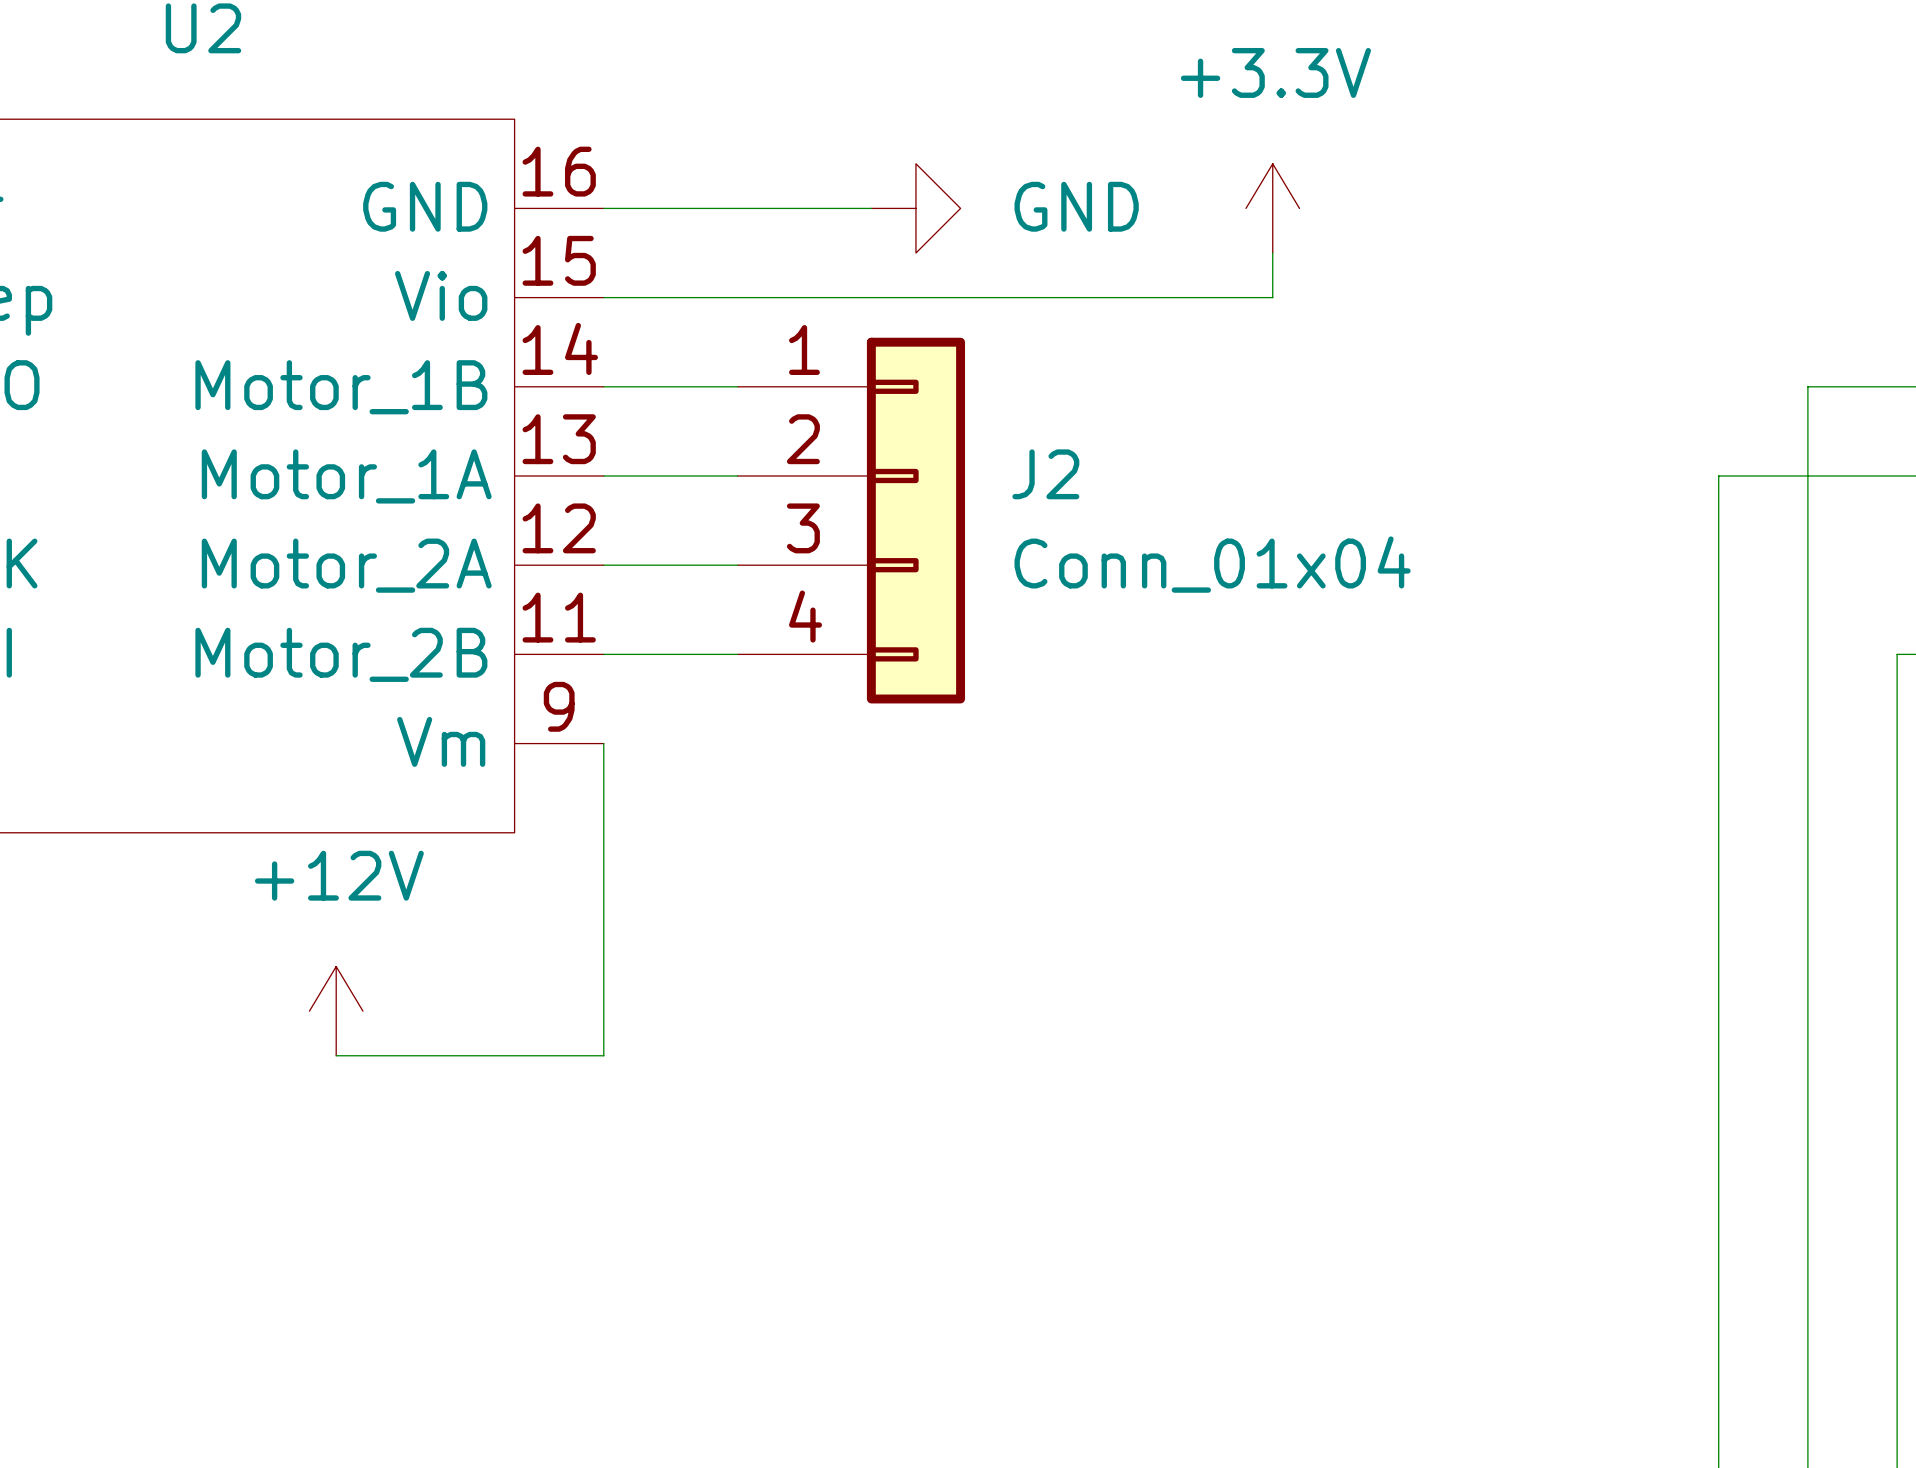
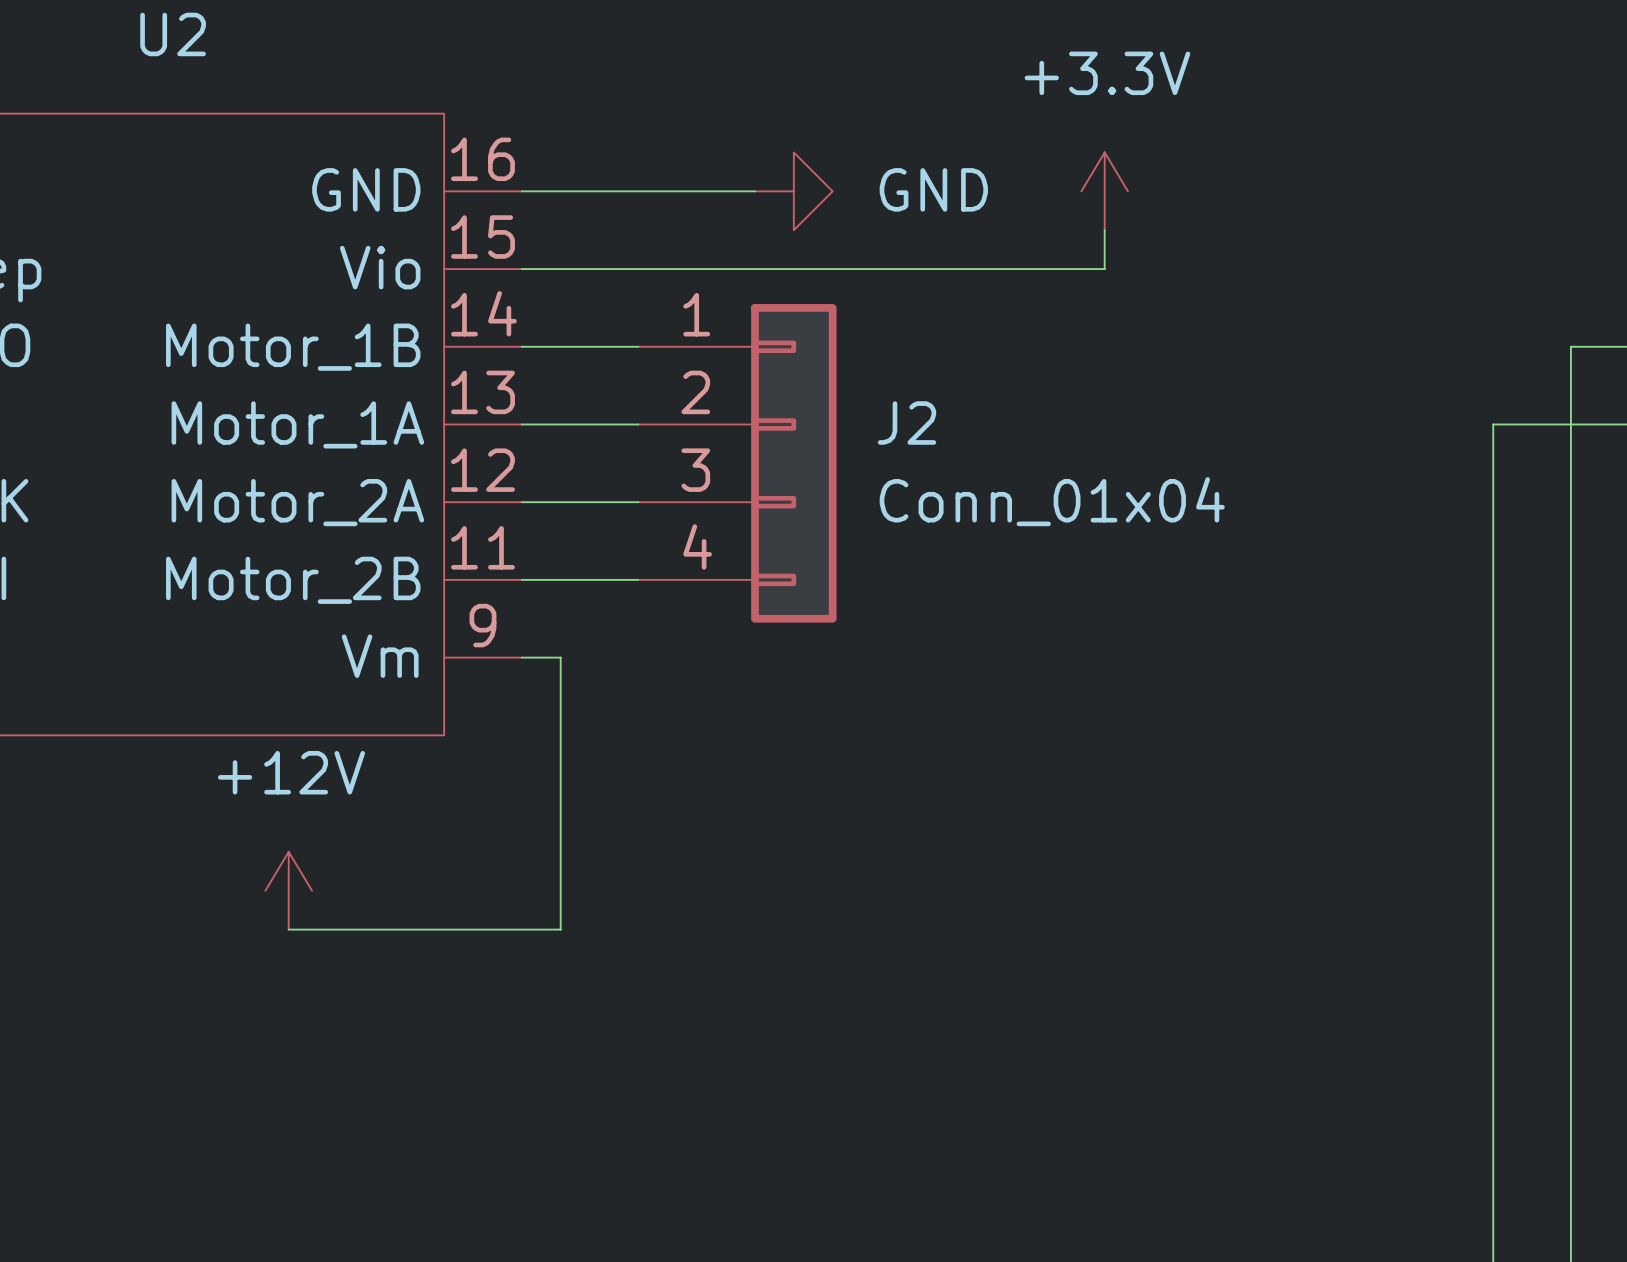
wire: (603, 743) (603, 1055) -> (521, 657) (560, 657) (560, 929) (521, 929)

